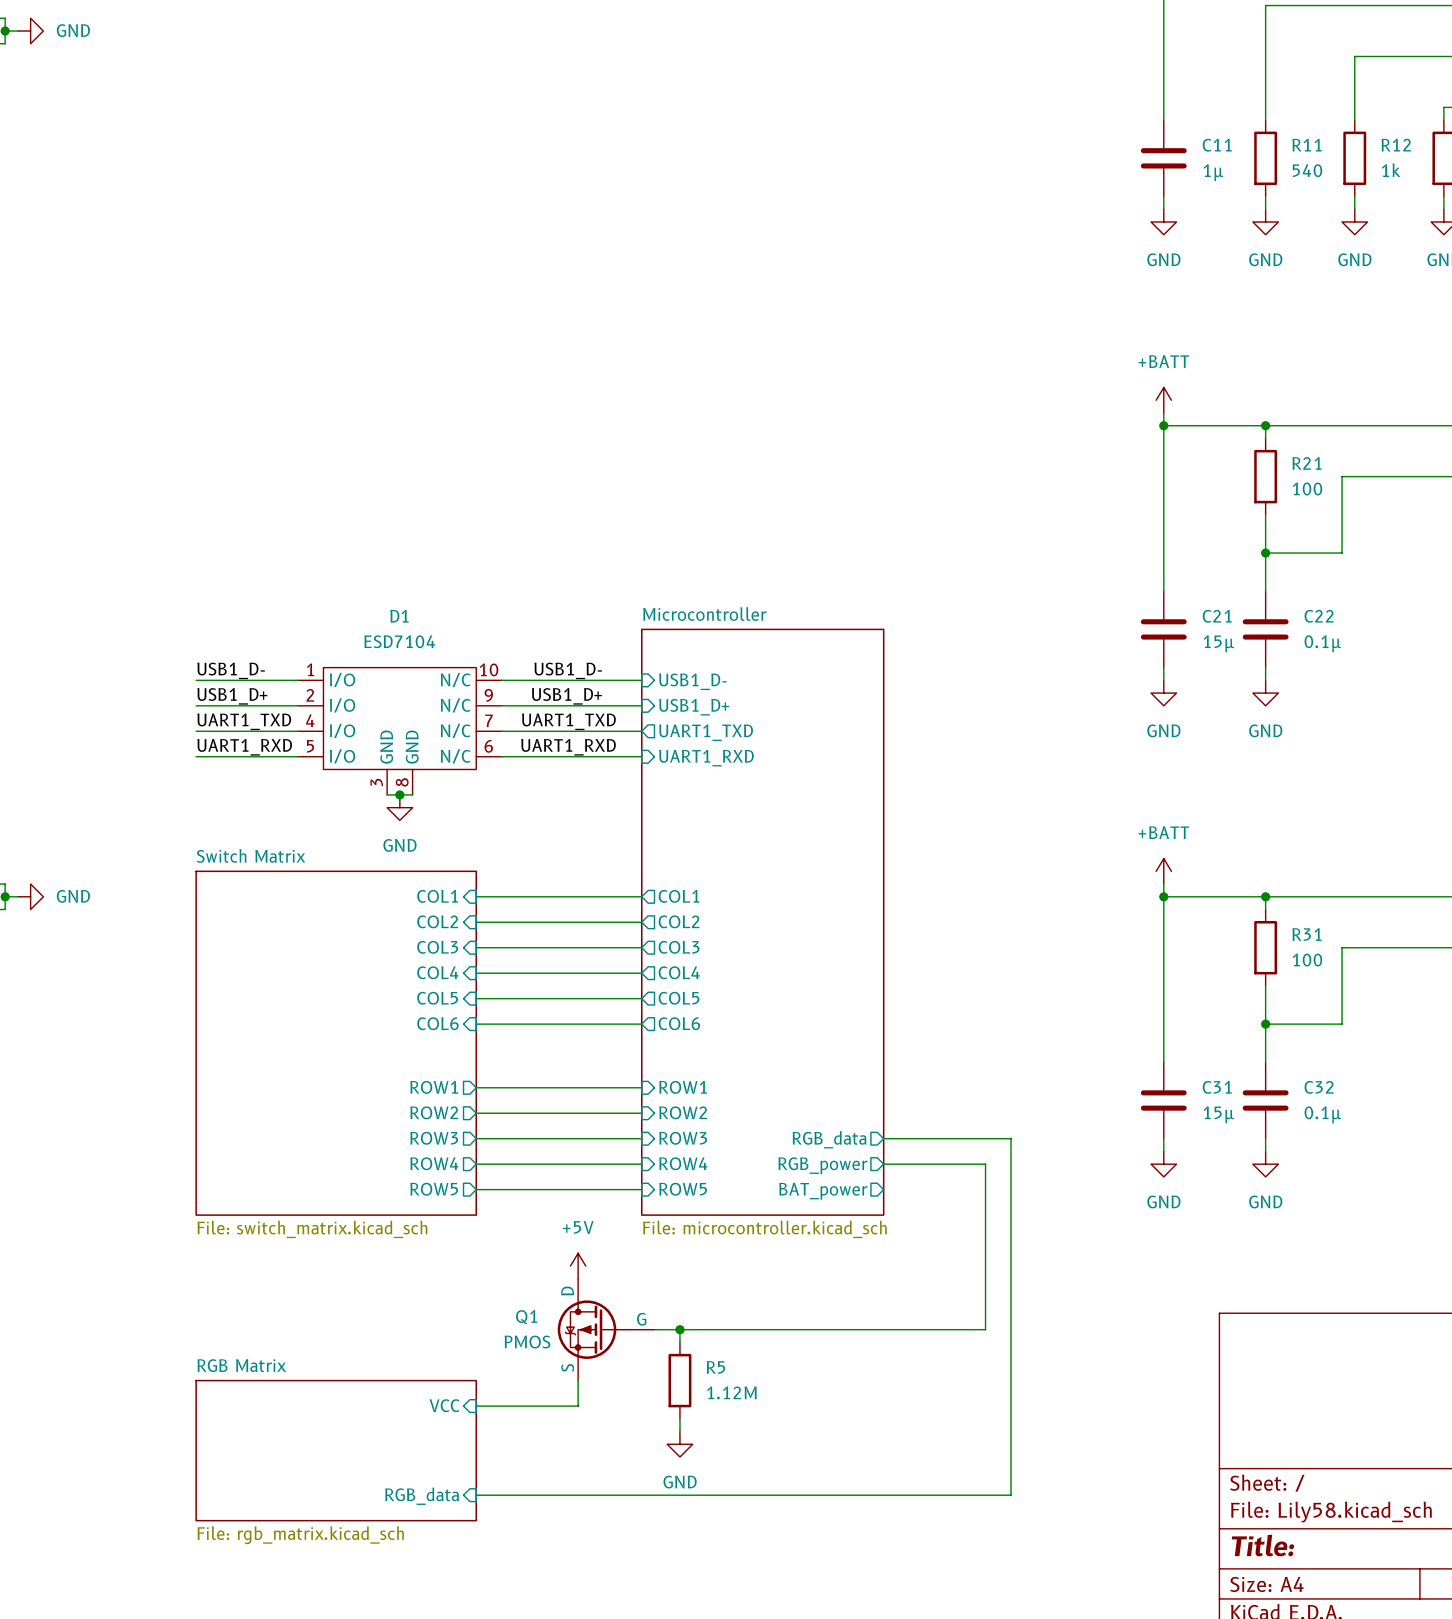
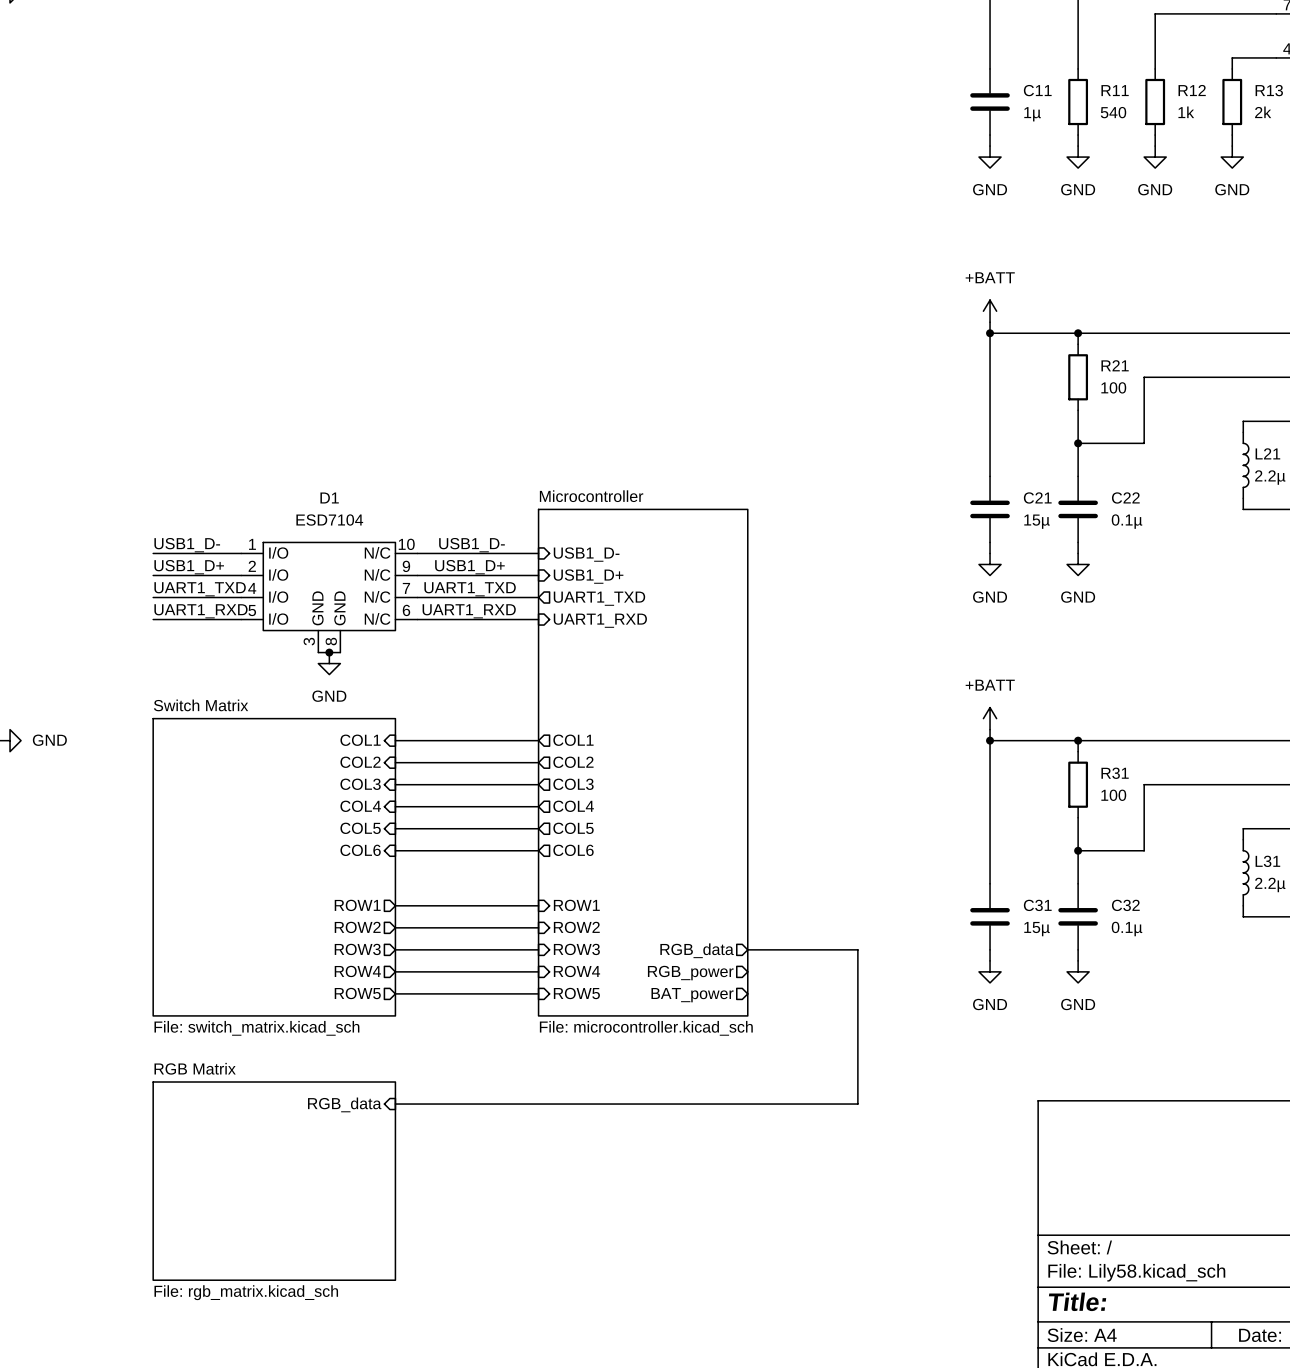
wire: (883, 1164) (985, 1164) (985, 1329) (654, 1329) -> none
power symbol: +5V (578, 1266) -> none
wire: (1010, 1316) (1010, 1495) (476, 1495) -> (857, 1104) (395, 1104)
Q1: PMOS (606, 1329) -> none
wire: (679, 1329) (679, 1342) -> none
junction: (679, 1329) -> none
wire: (578, 1380) (578, 1406) (476, 1406) -> none
R5: 1.12M (679, 1380) -> none
sheet pin: VCC (444, 1405) -> none
sheet RGB Matrix: none -> File: rgb_matrix.kicad_sch (274, 1181)
wire: (679, 1418) (679, 1431) -> none
power symbol: GND (679, 1444) -> none
sheet RGB Matrix: File: rgb_matrix.kicad_sch (336, 1450) -> none
sheet pin position: RGB_data (422, 1496) -> RGB_data (344, 1104)

